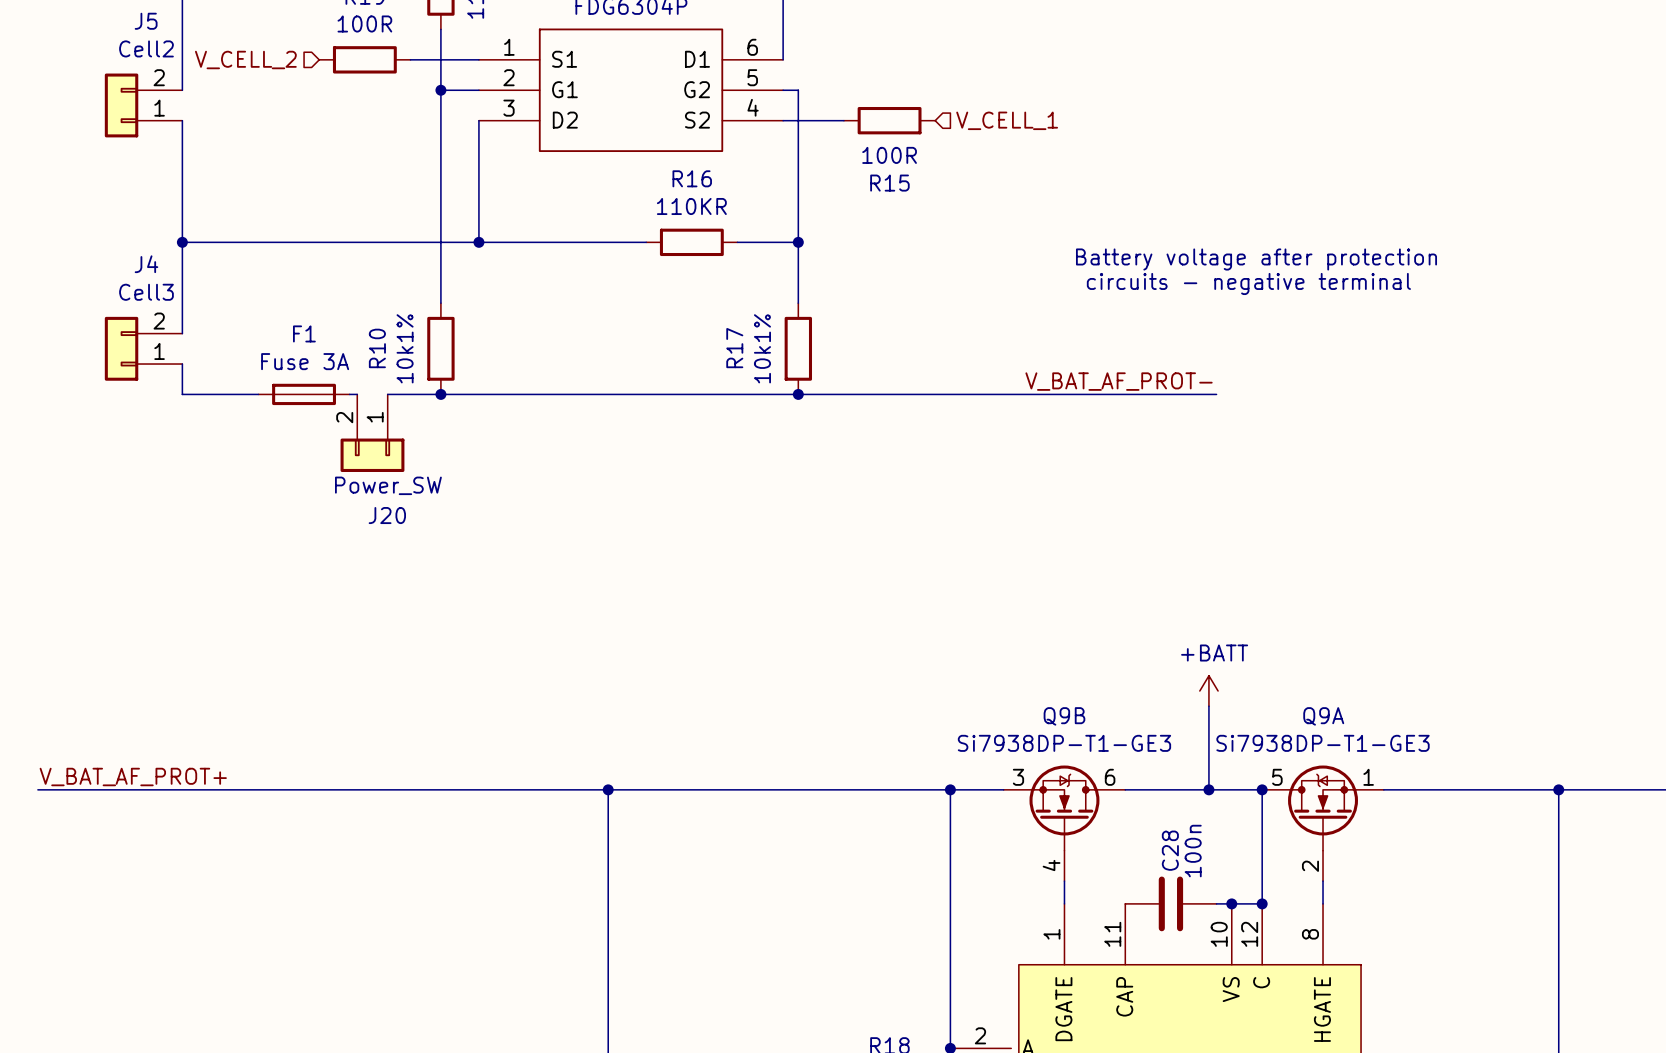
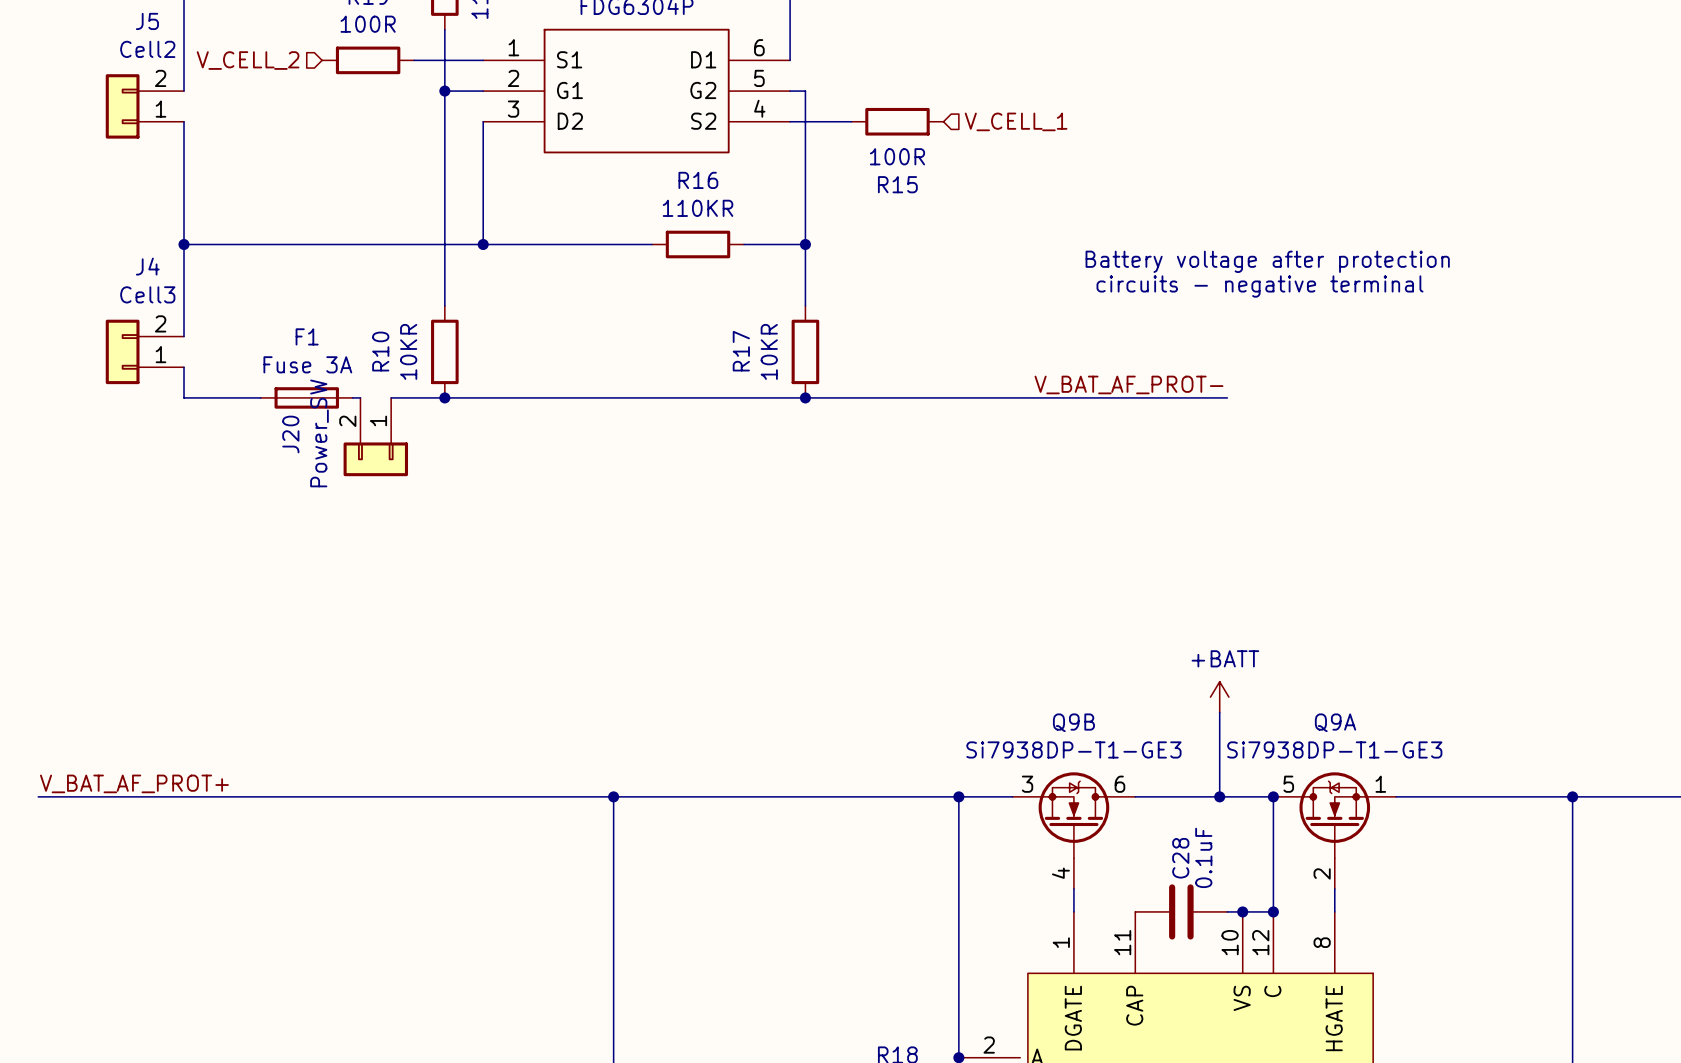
R10 value: 10k1% (405, 348) -> 10KR (408, 351)
R17 value: 10k1% (762, 348) -> 10KR (769, 351)
J20 value rotation: 0° (388, 485) -> 90° counterclockwise (319, 433)
J20 name rotation: 0° (387, 515) -> 90° counterclockwise (290, 434)
J20 name position: J20 (387, 515) -> J20 (290, 434)
C28 value: 100n (1193, 851) -> 0.1uF (1203, 857)

